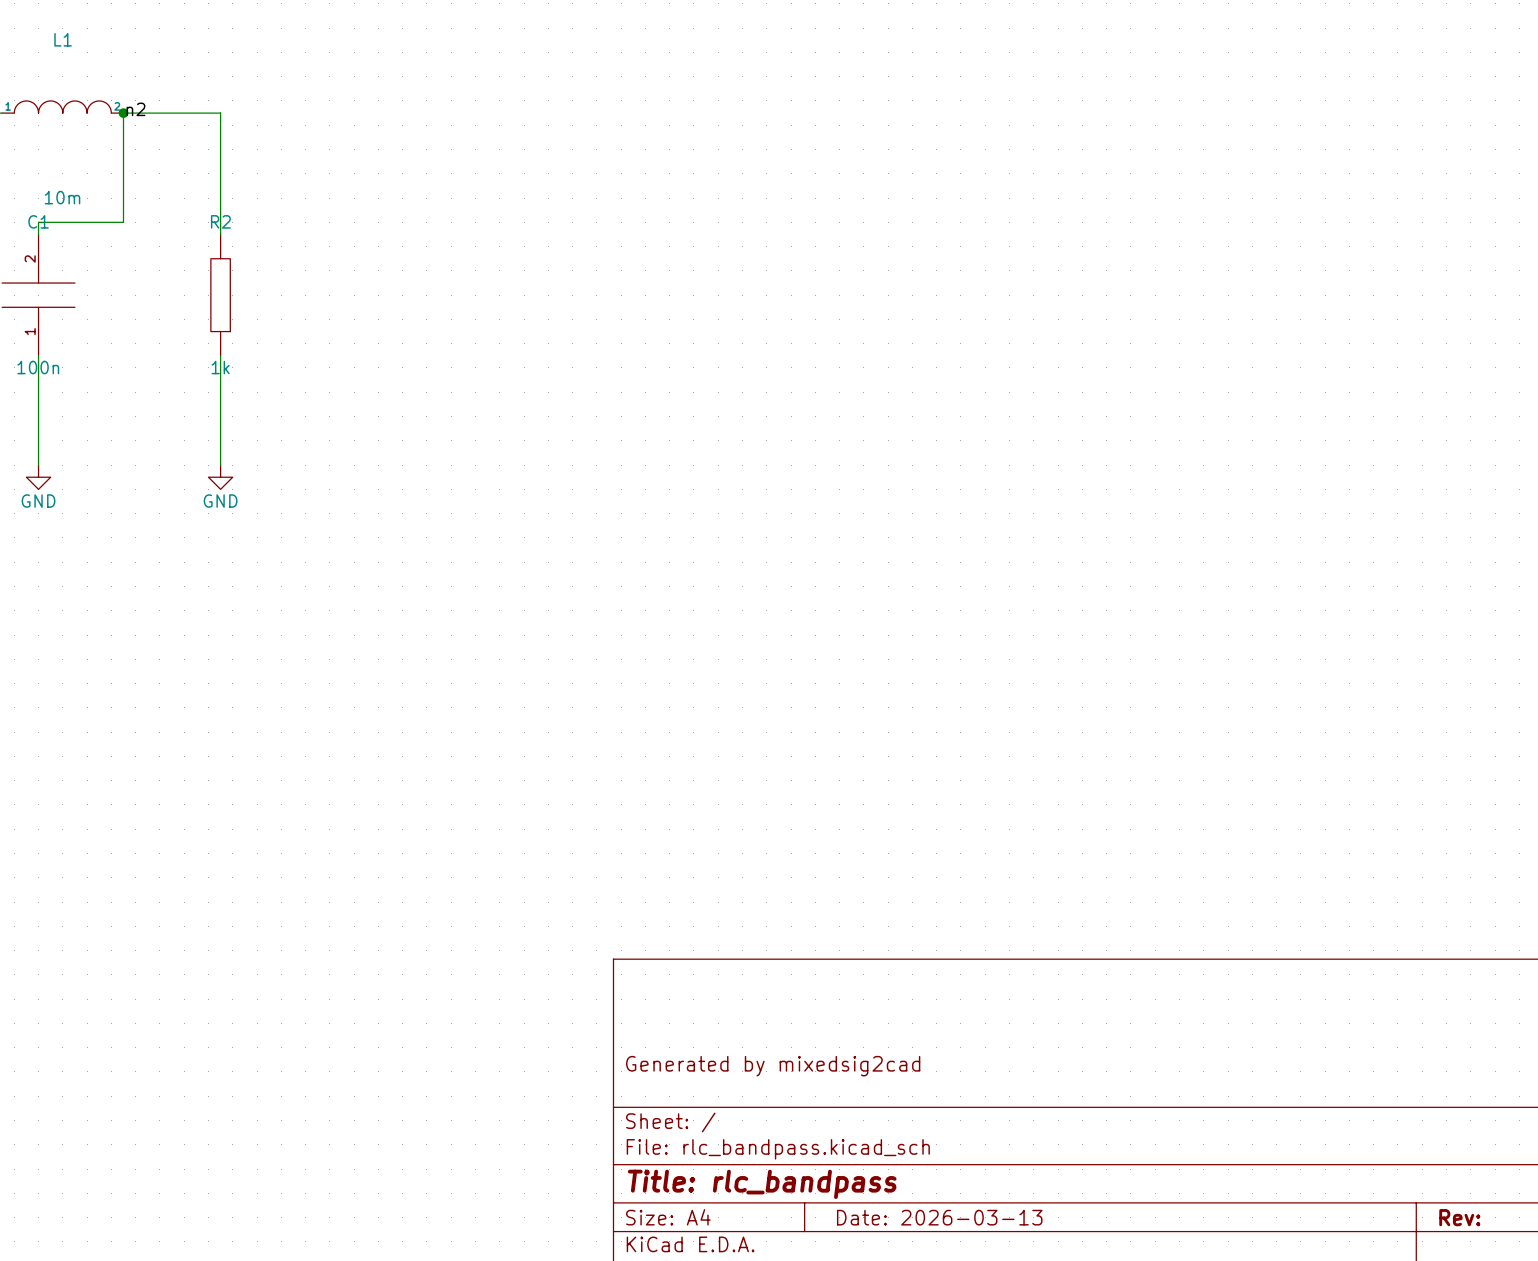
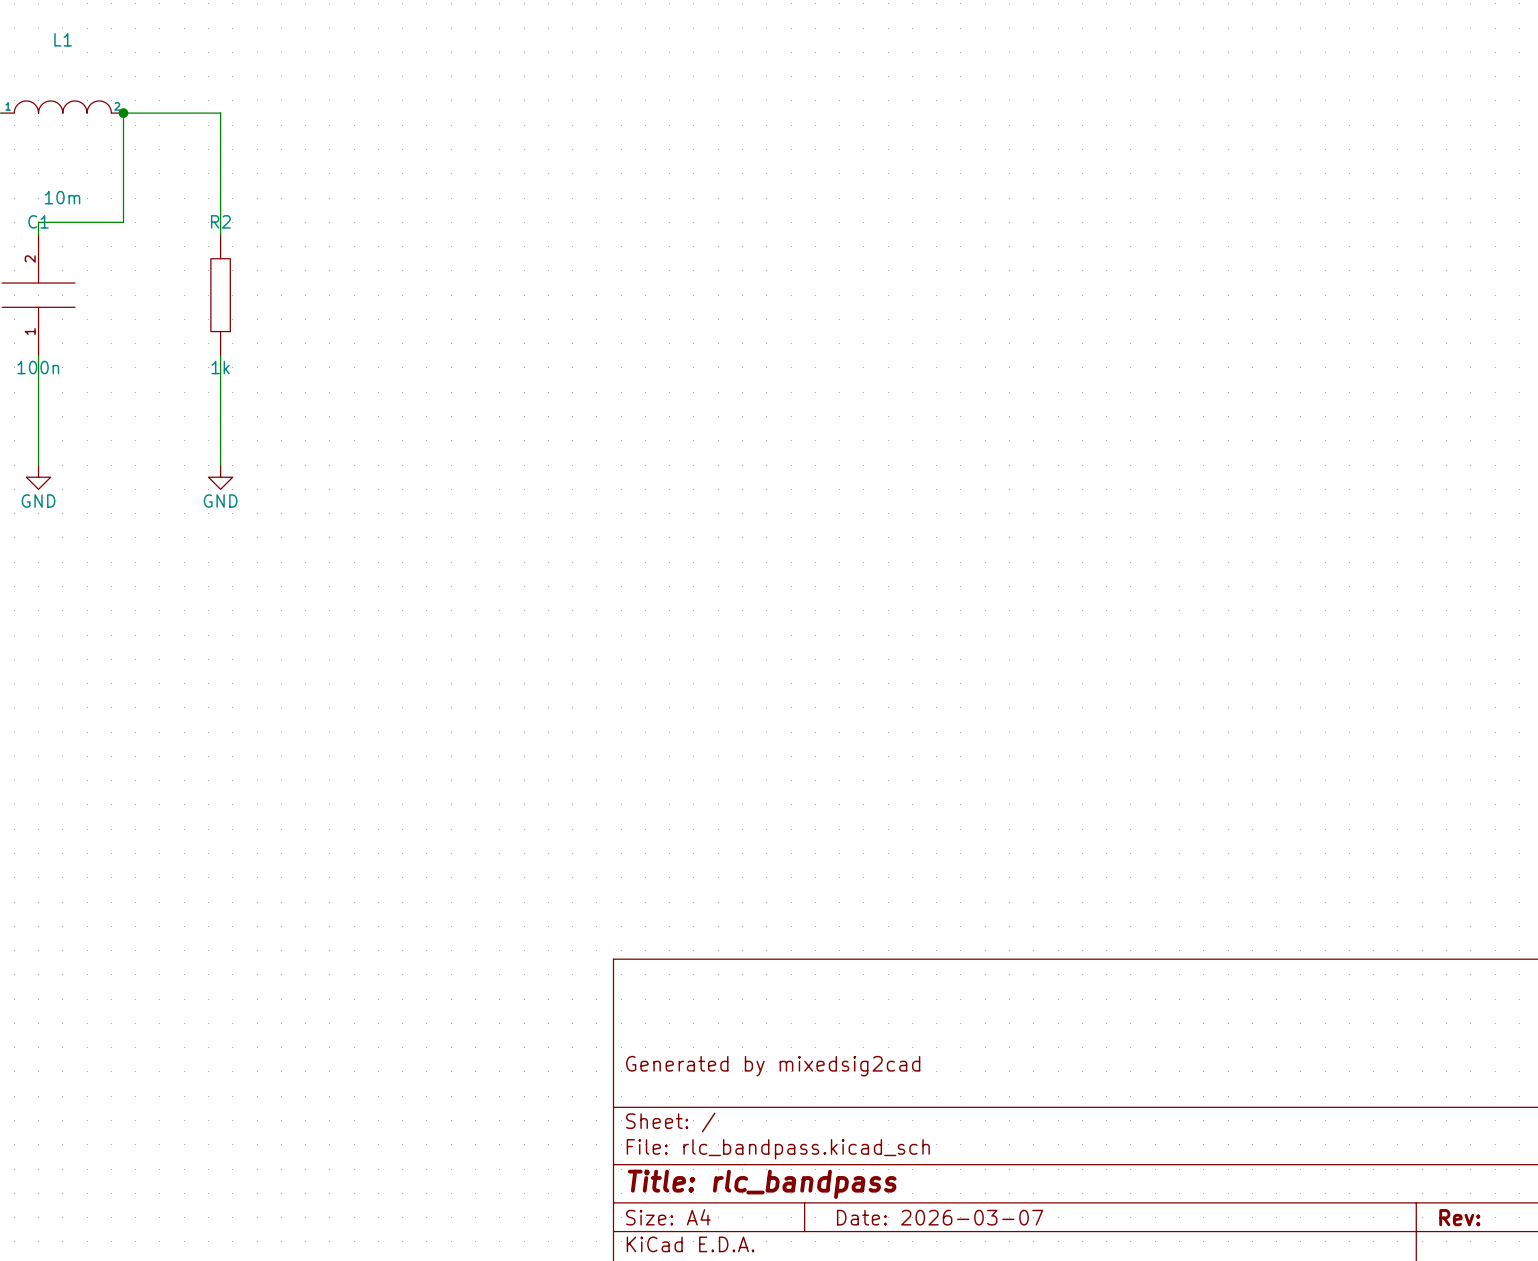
label: n2 (136, 109) -> none
title block: Date: 2026-03-13 (939, 1217) -> Date: 2026-03-07 (940, 1217)

